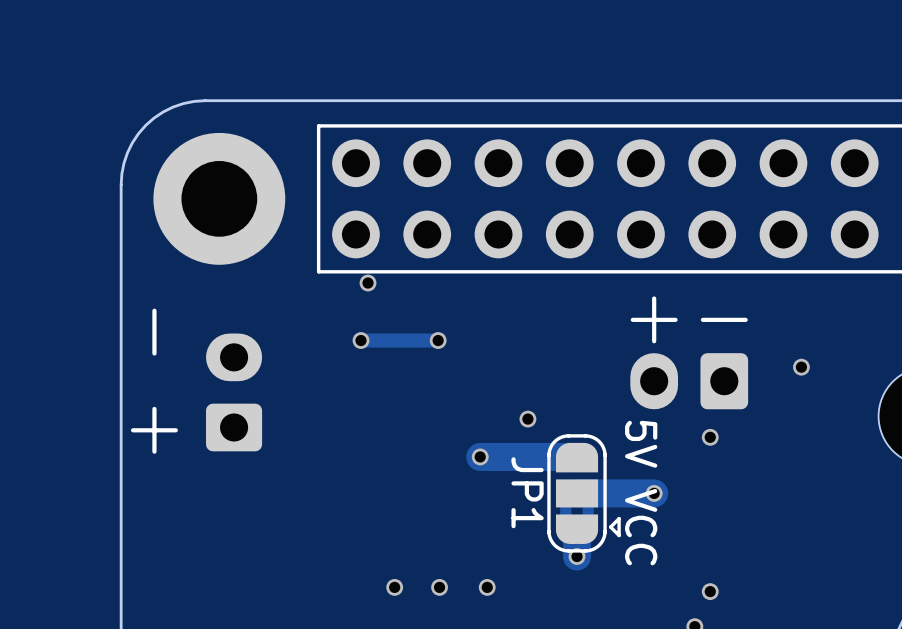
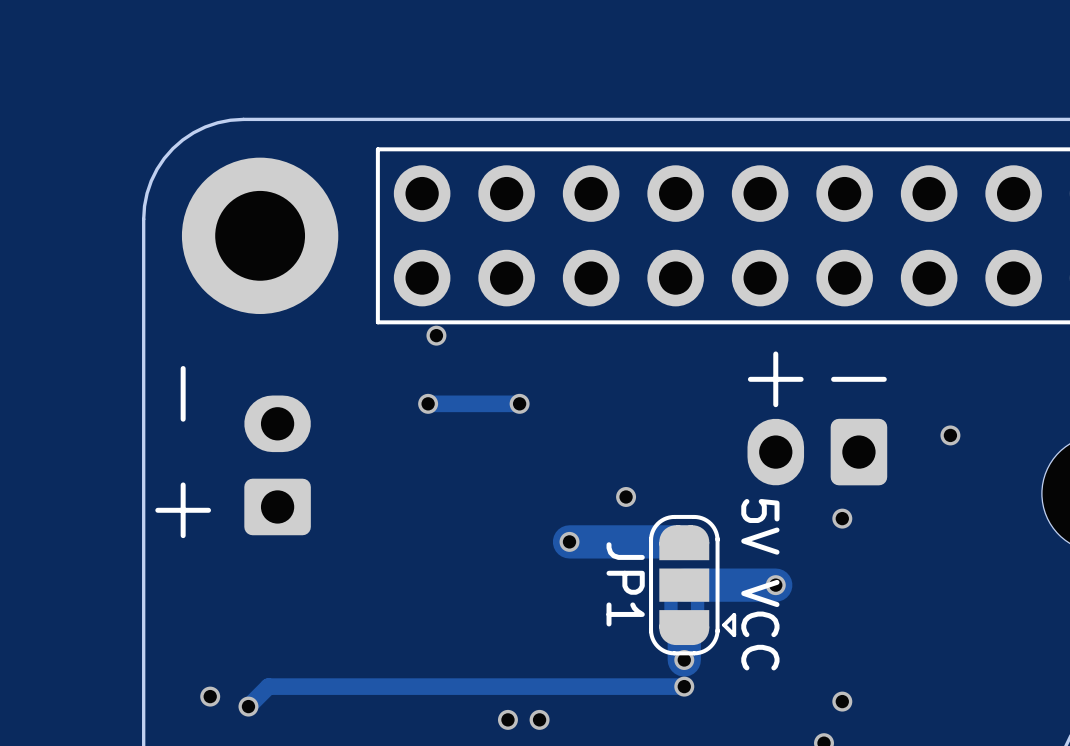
track: none -> (684, 686) (268, 686) (248, 706)
via: none -> (684, 686)
via: none -> (210, 696)
via: (394, 587) -> none
via: (439, 587) -> none
via: (487, 587) -> none
via: none -> (248, 706)
via: none -> (507, 719)
via: none -> (539, 719)

